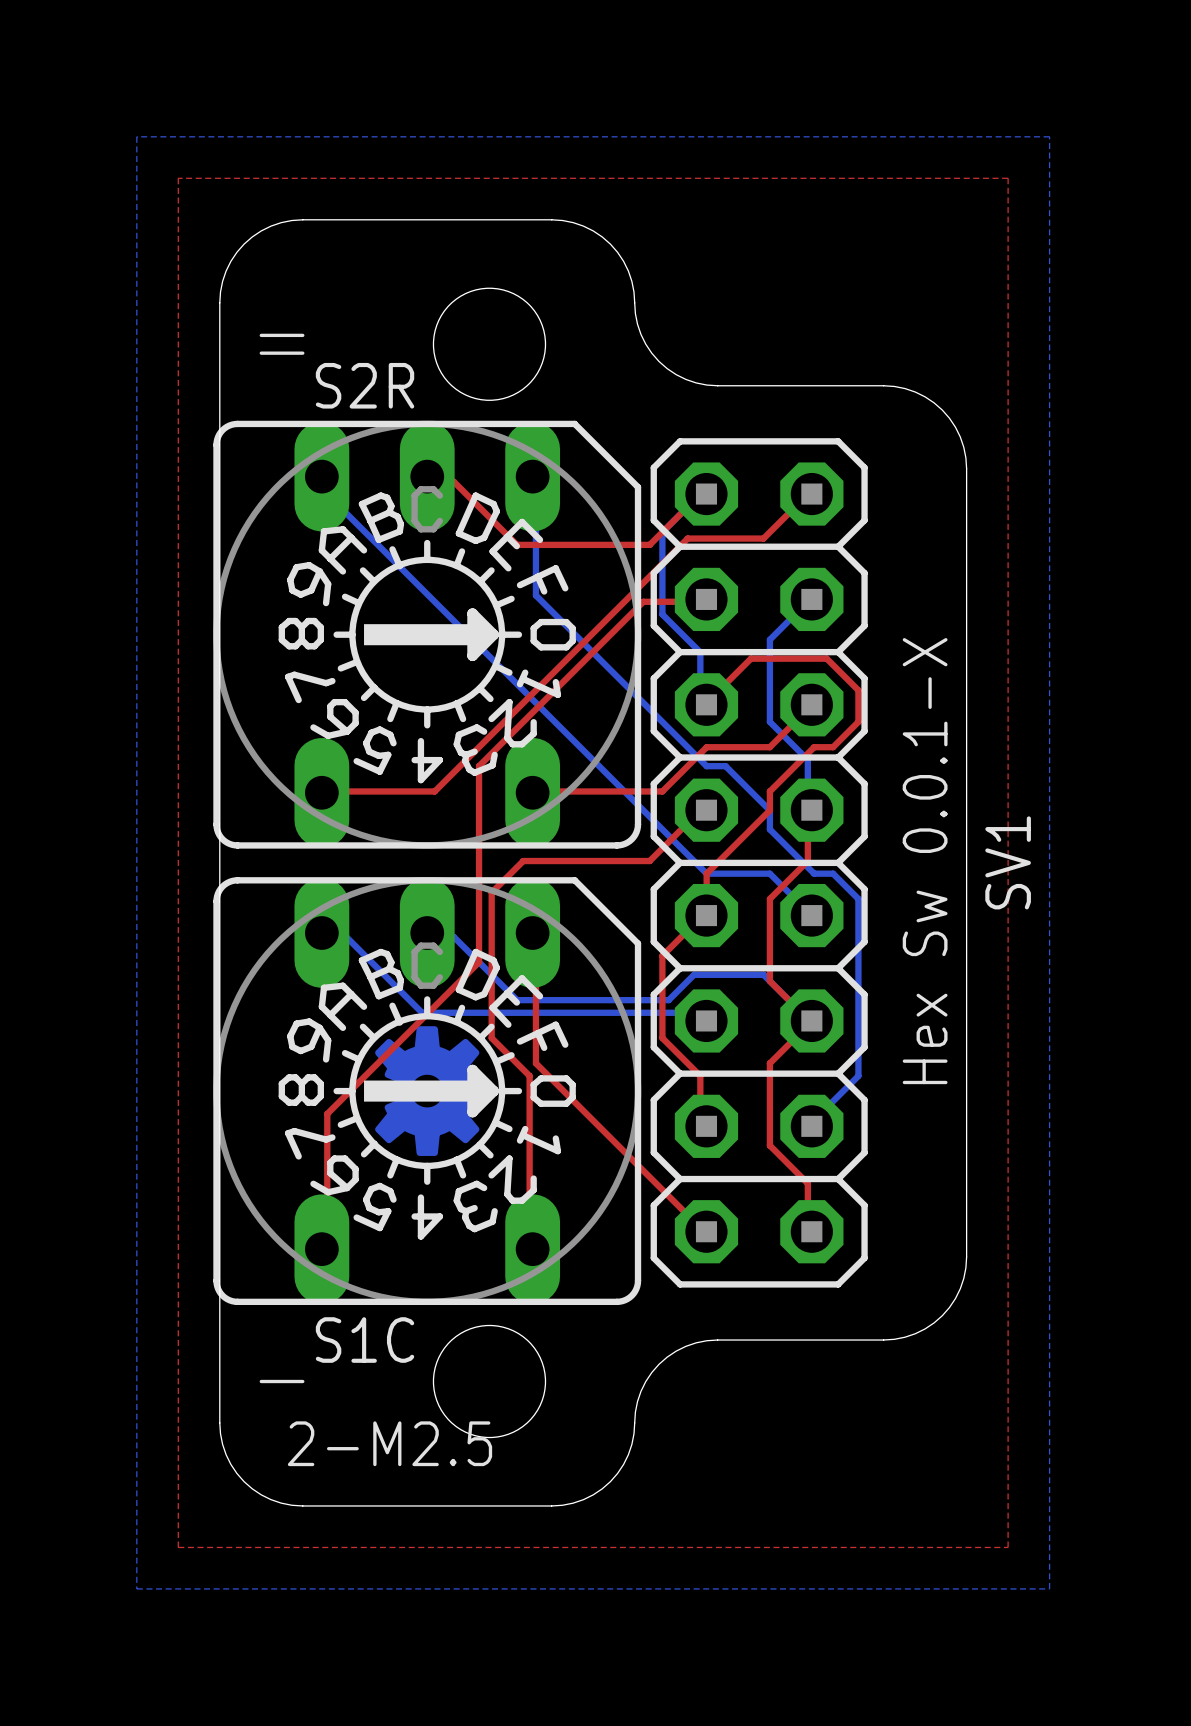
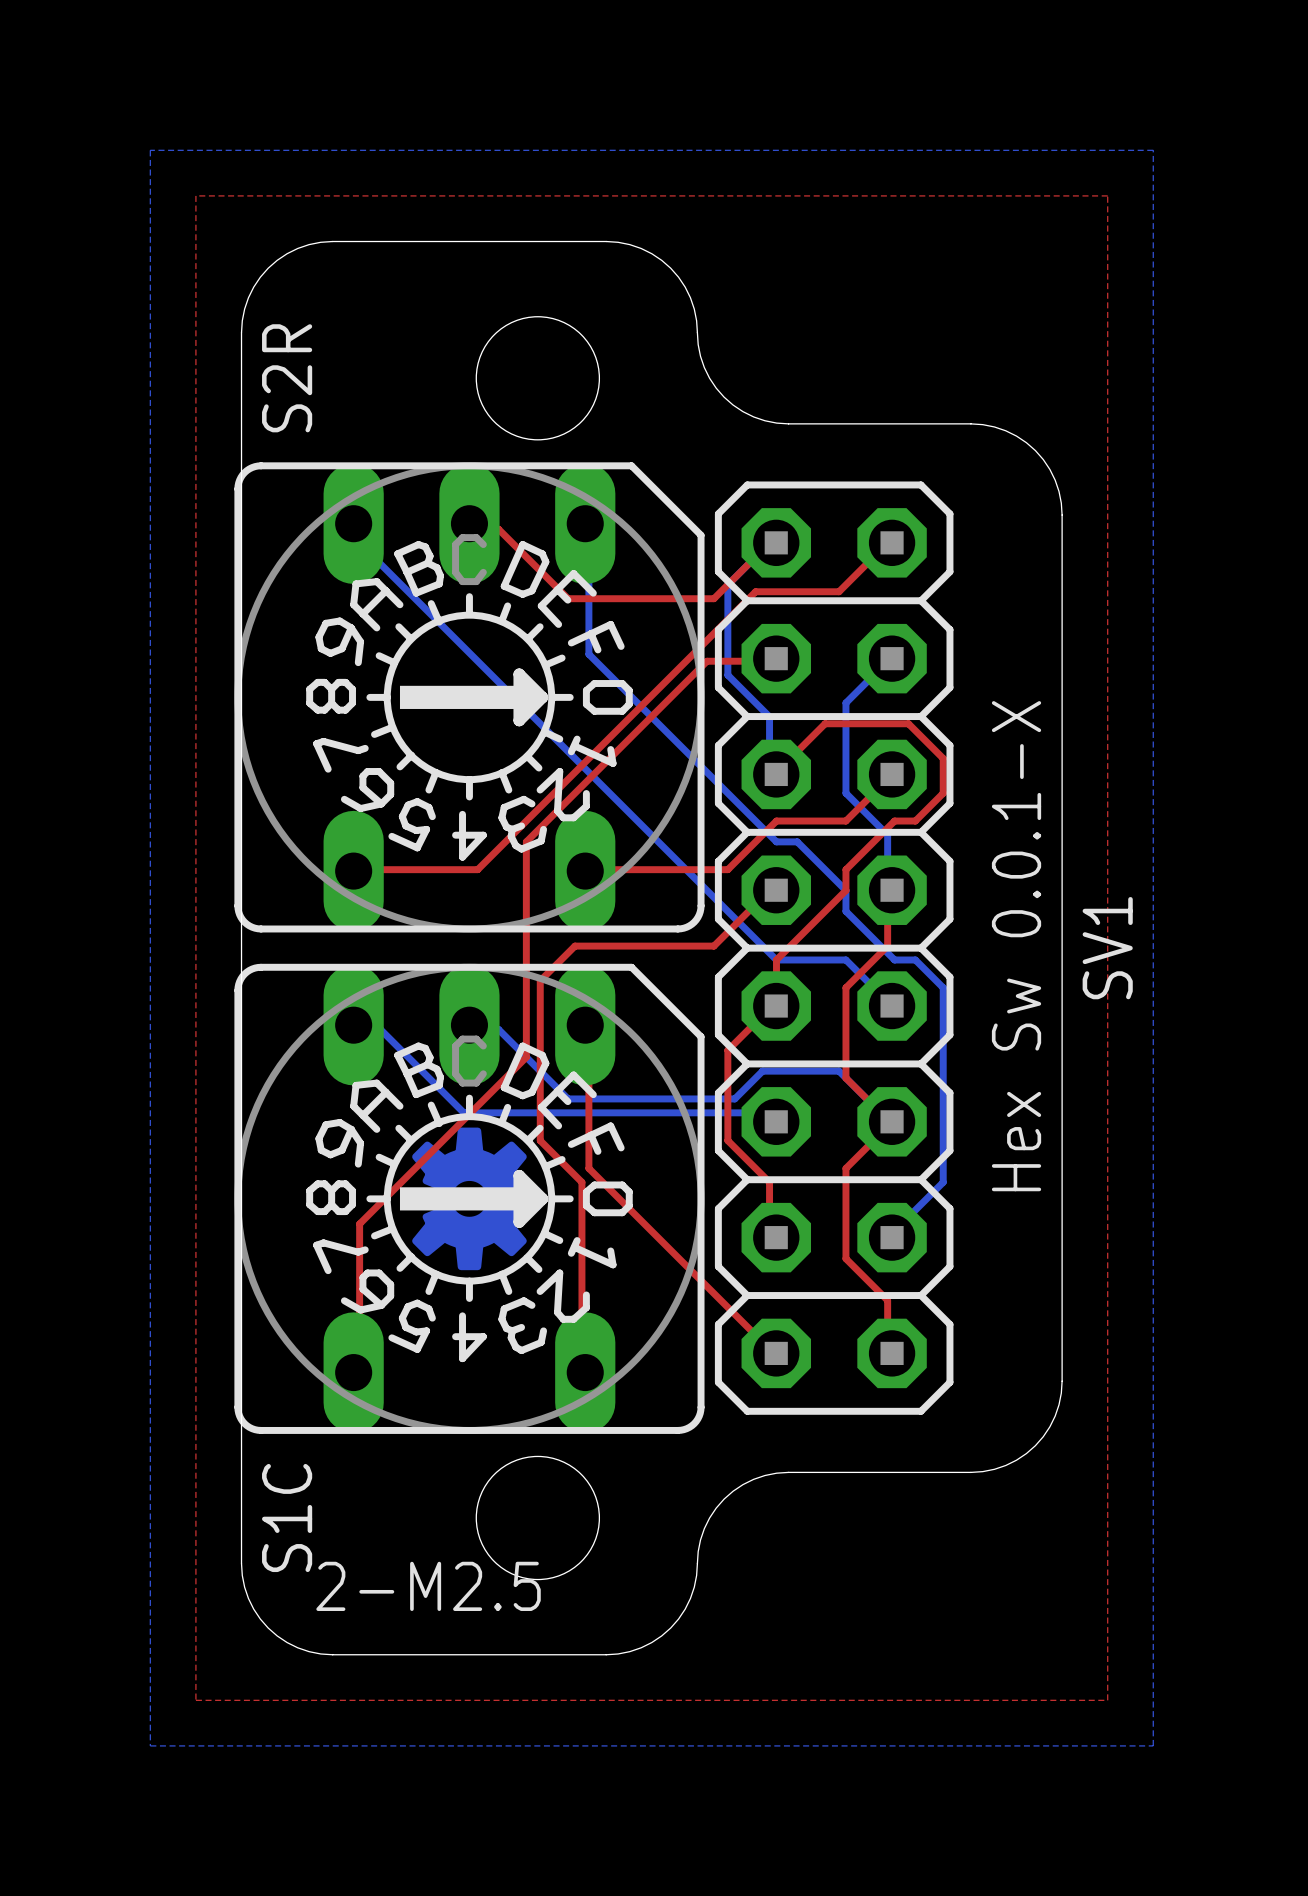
text: II (282, 344) -> none
S2R name rotation: 0° (365, 385) -> 90° counterclockwise (287, 378)
S1C name rotation: 0° (365, 1340) -> 90° counterclockwise (287, 1517)
text: I (282, 1381) -> none

